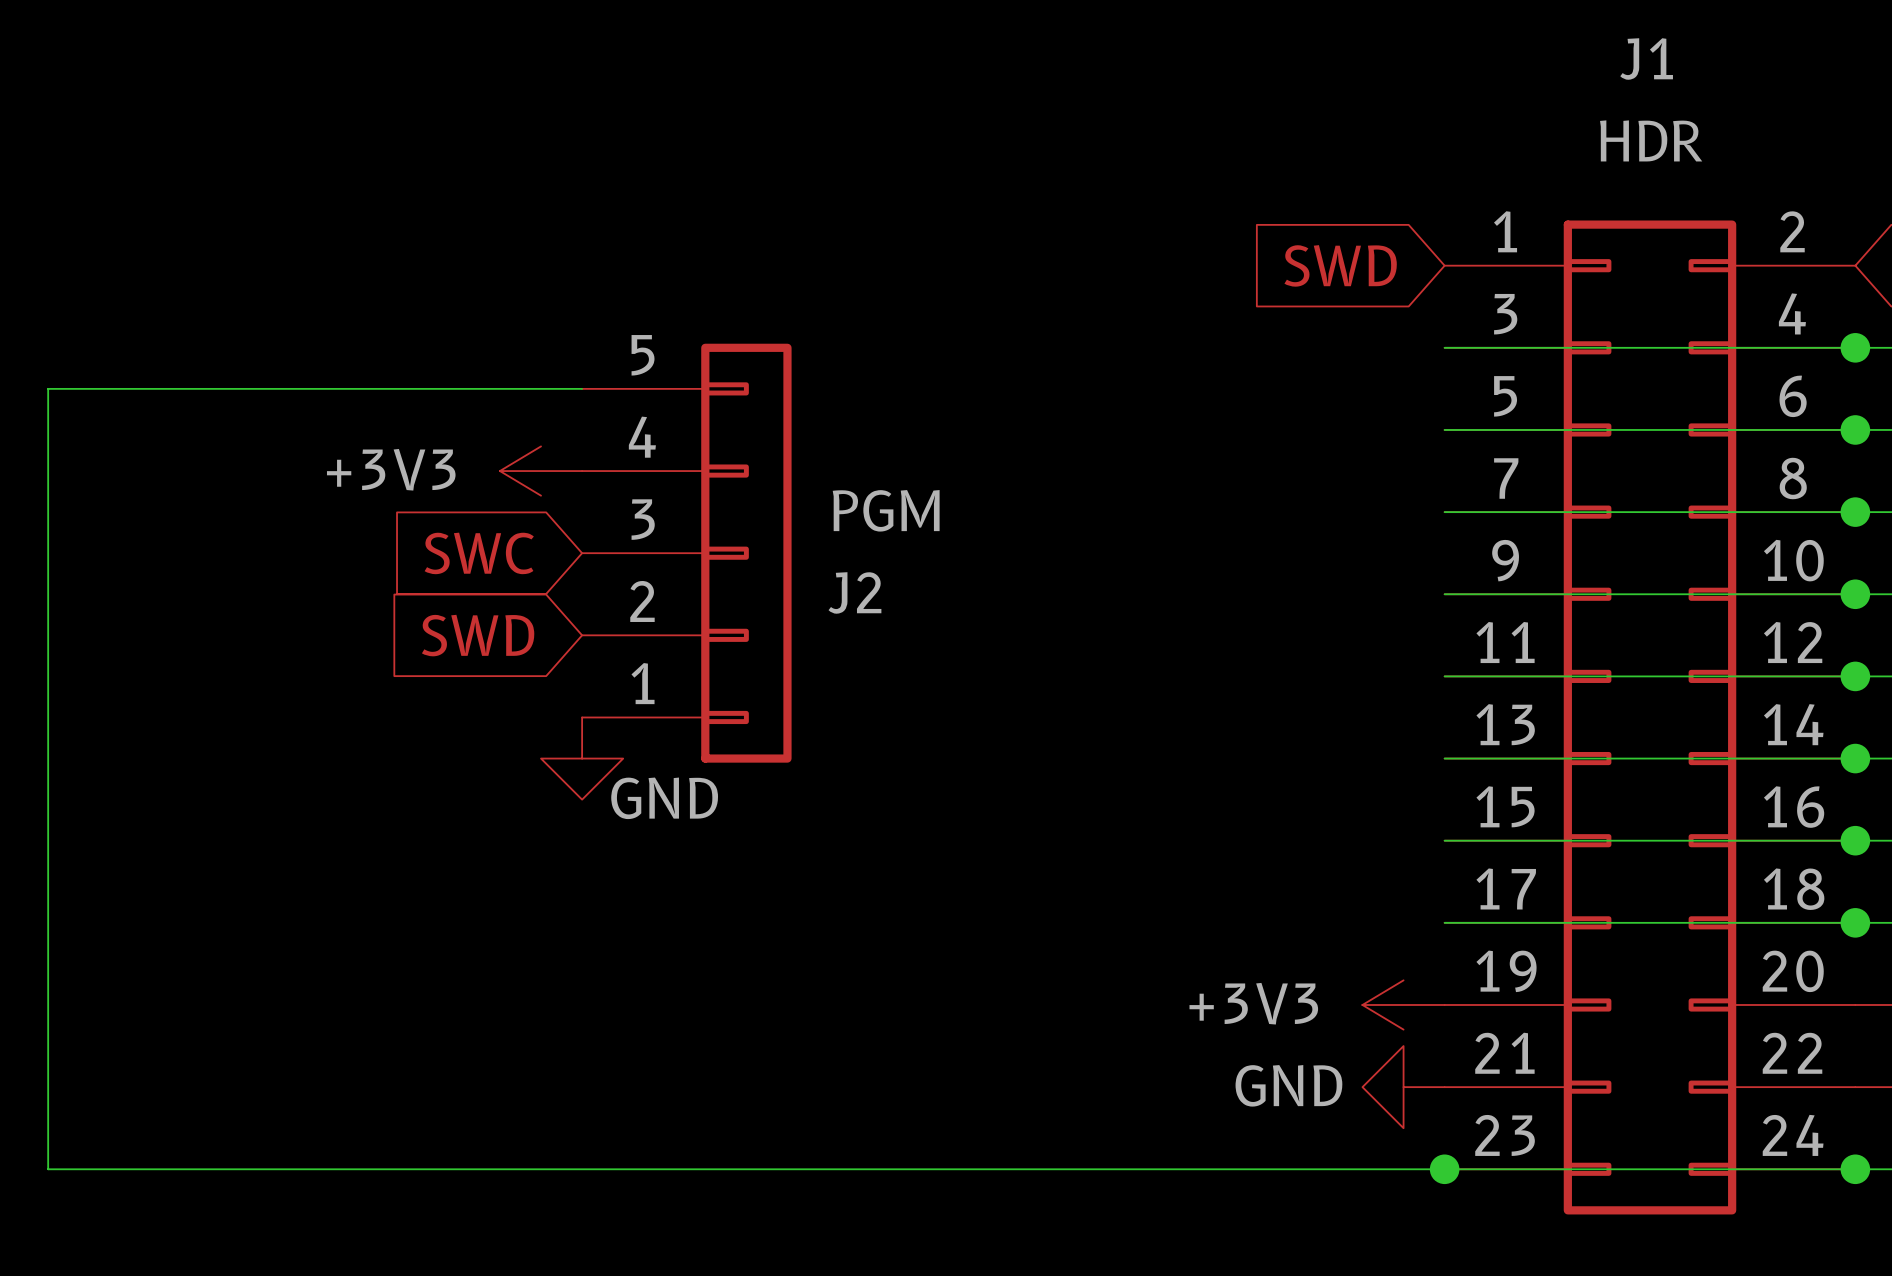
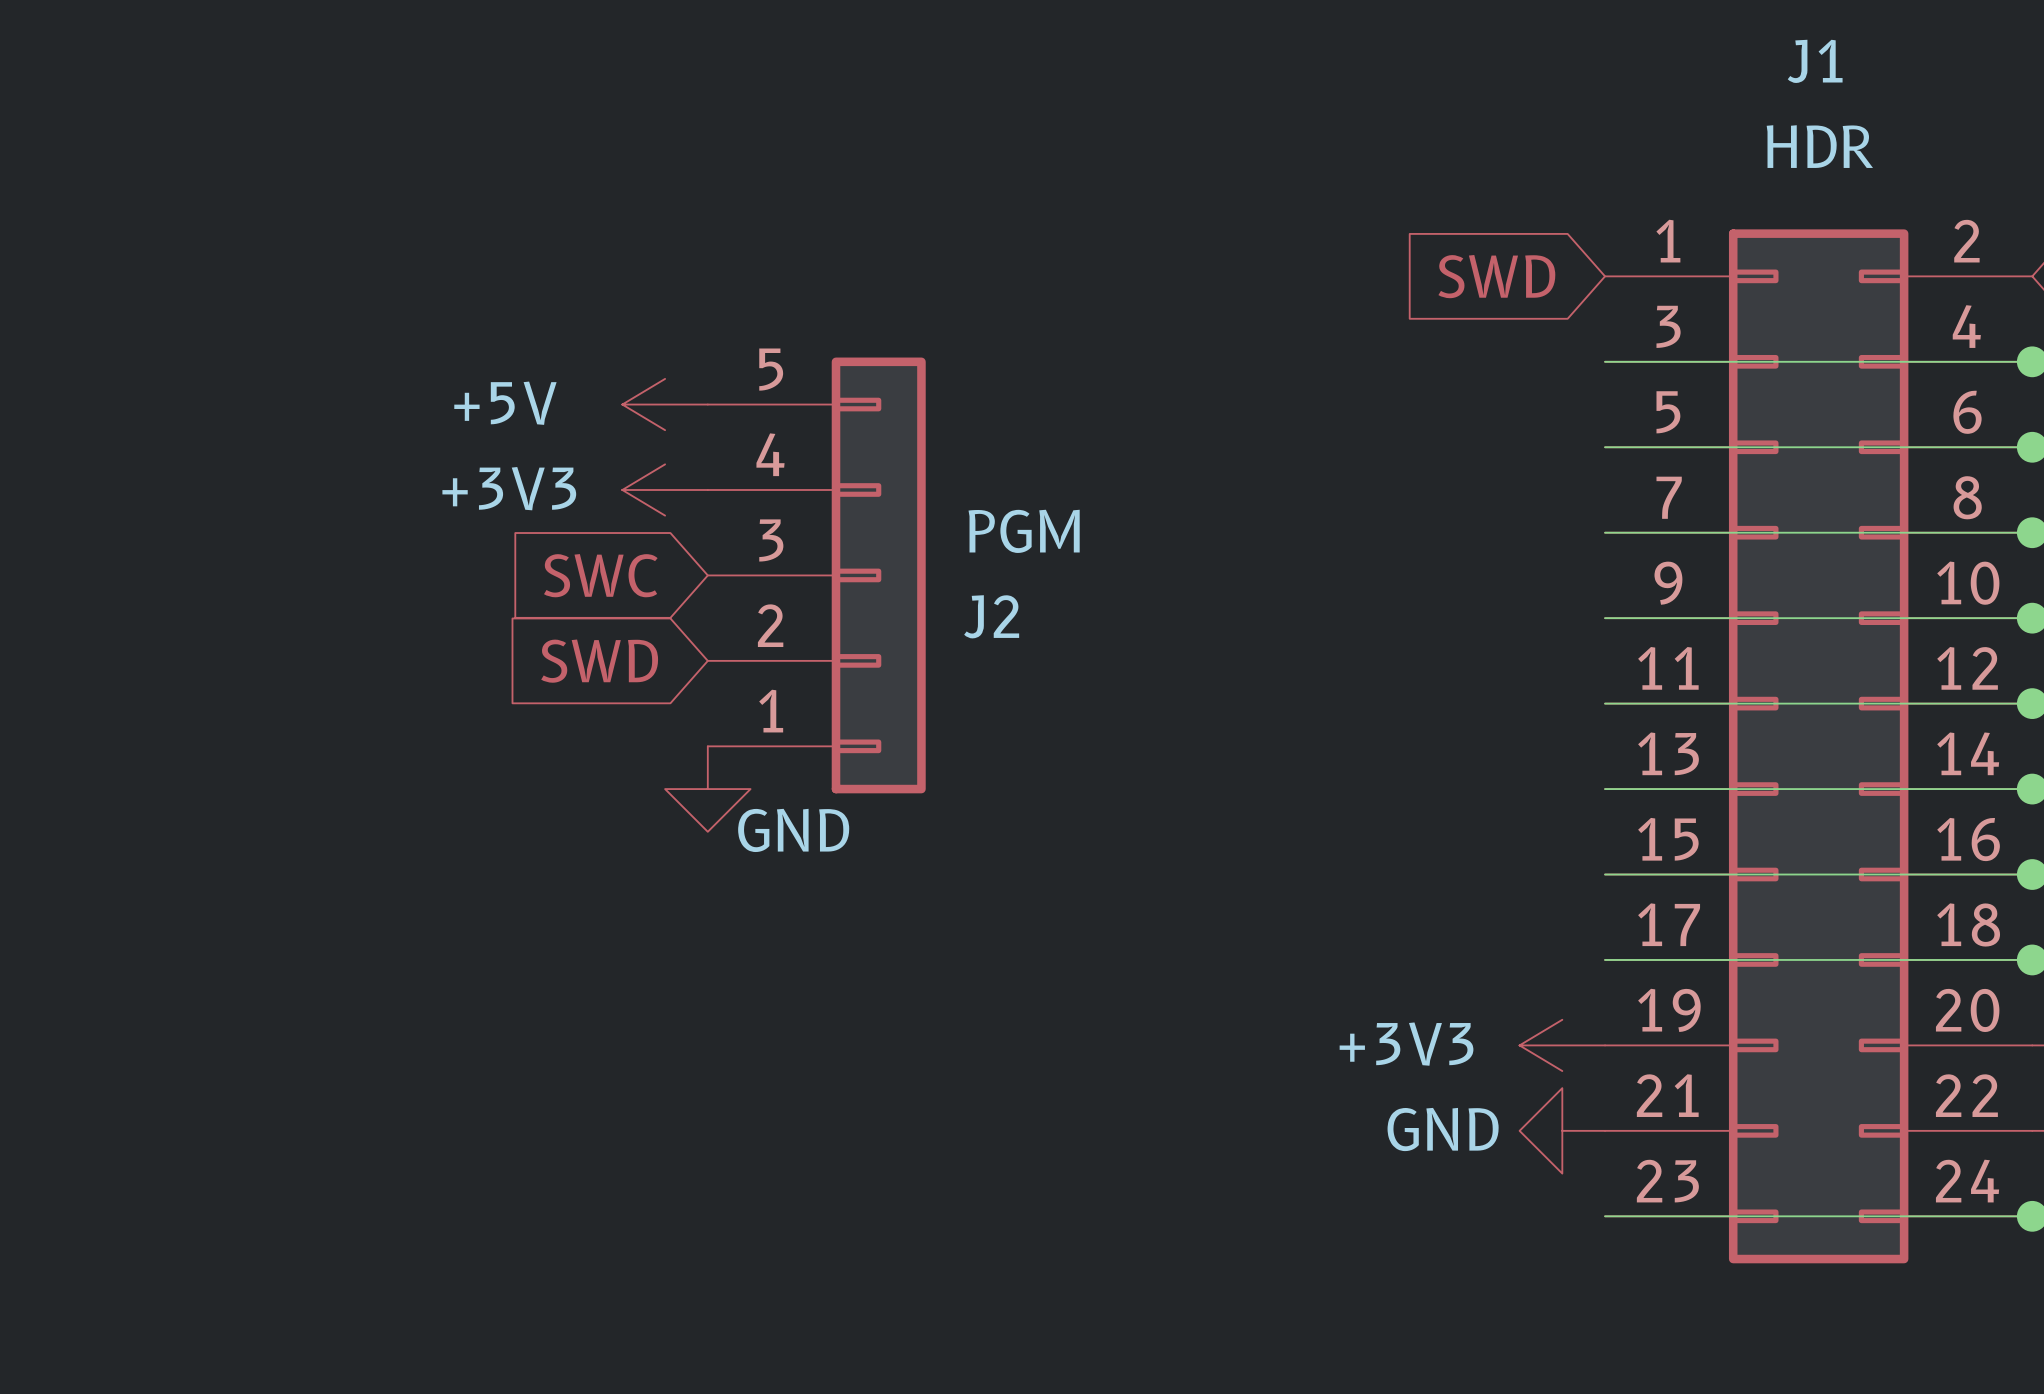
power symbol: none -> +5V (665, 404)
wire: (582, 388) (48, 388) (48, 1169) (1444, 1169) -> none
junction: (1444, 1169) -> none

